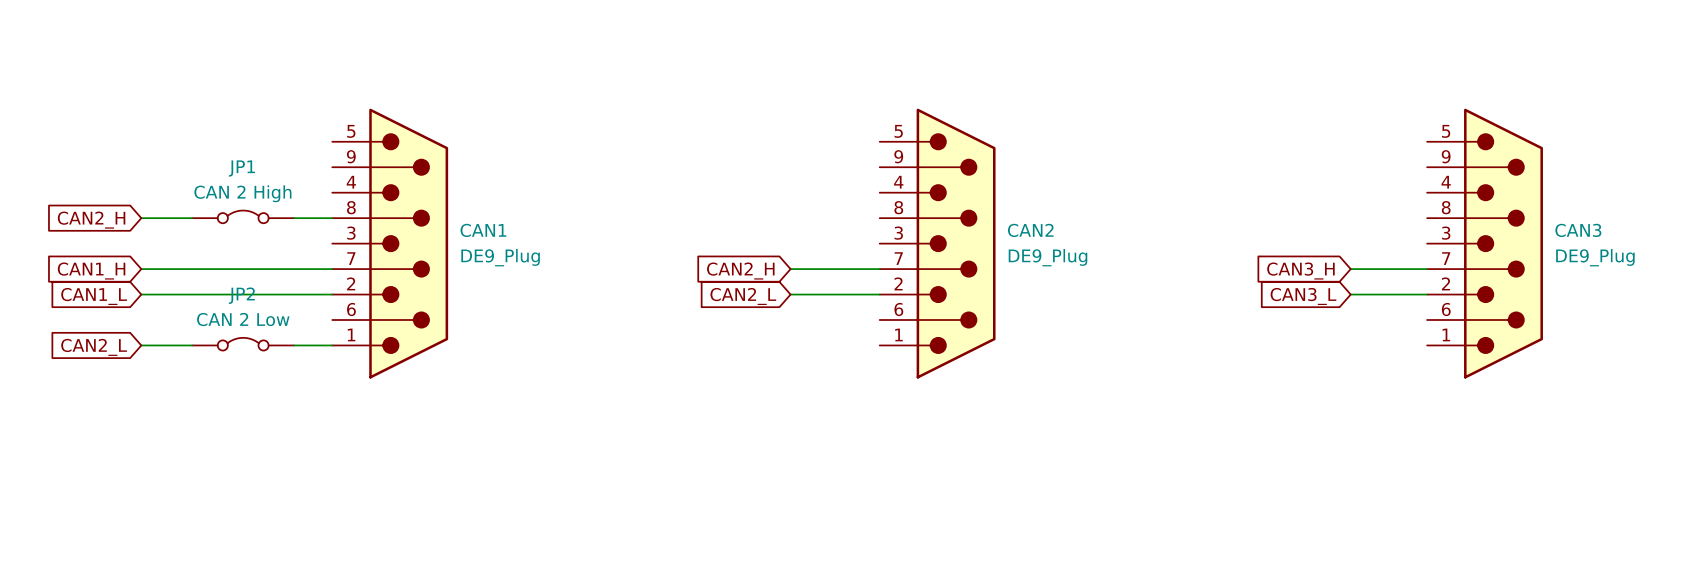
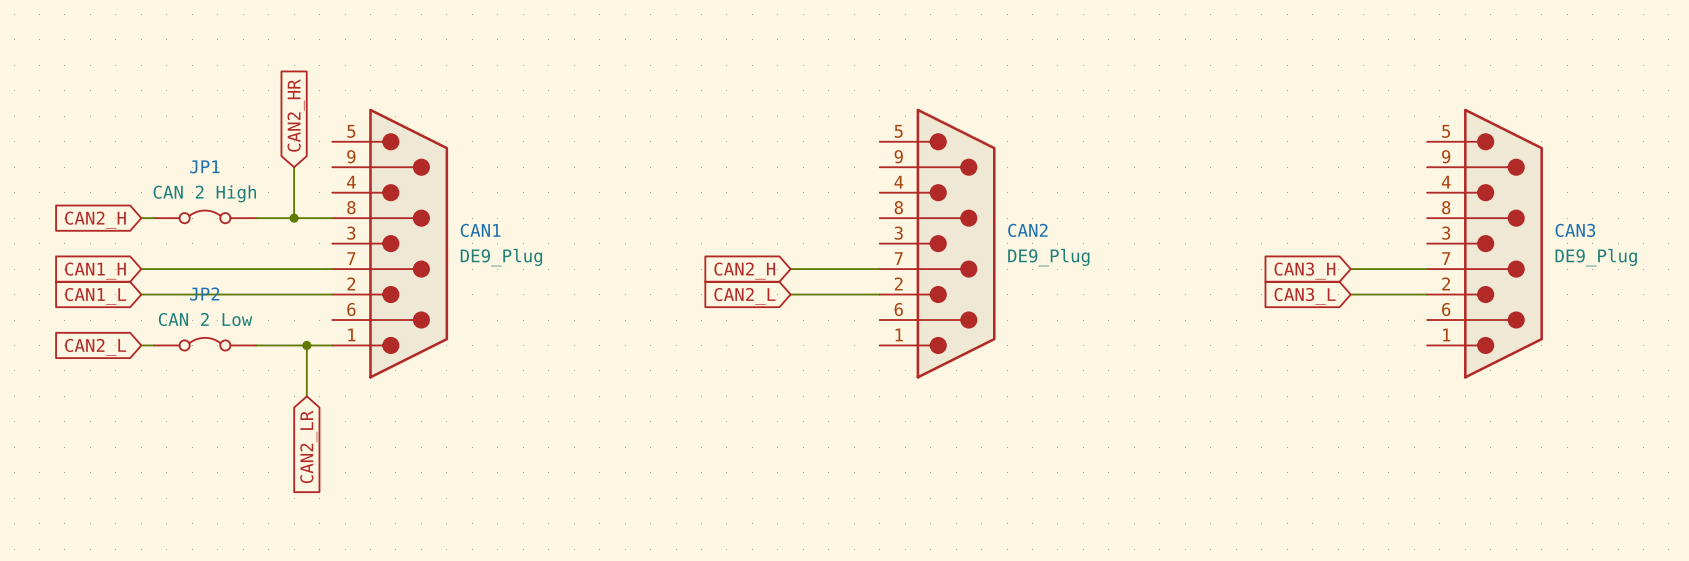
global label: none -> CAN2_HR (296, 115)
wire: none -> (294, 167) (294, 218) (255, 218)
JP1 position: (243, 216) -> (204, 216)
junction: none -> (294, 218)
JP2 position: (243, 344) -> (204, 344)
wire: none -> (306, 345) (306, 396)
junction: none -> (306, 345)
global label: none -> CAN2_LR (308, 446)

